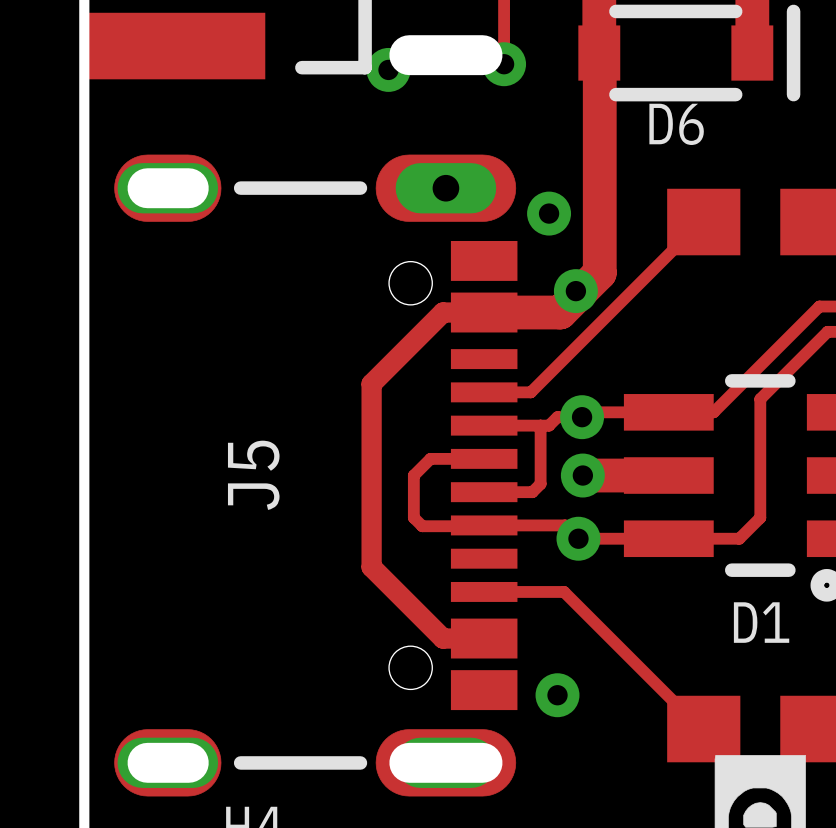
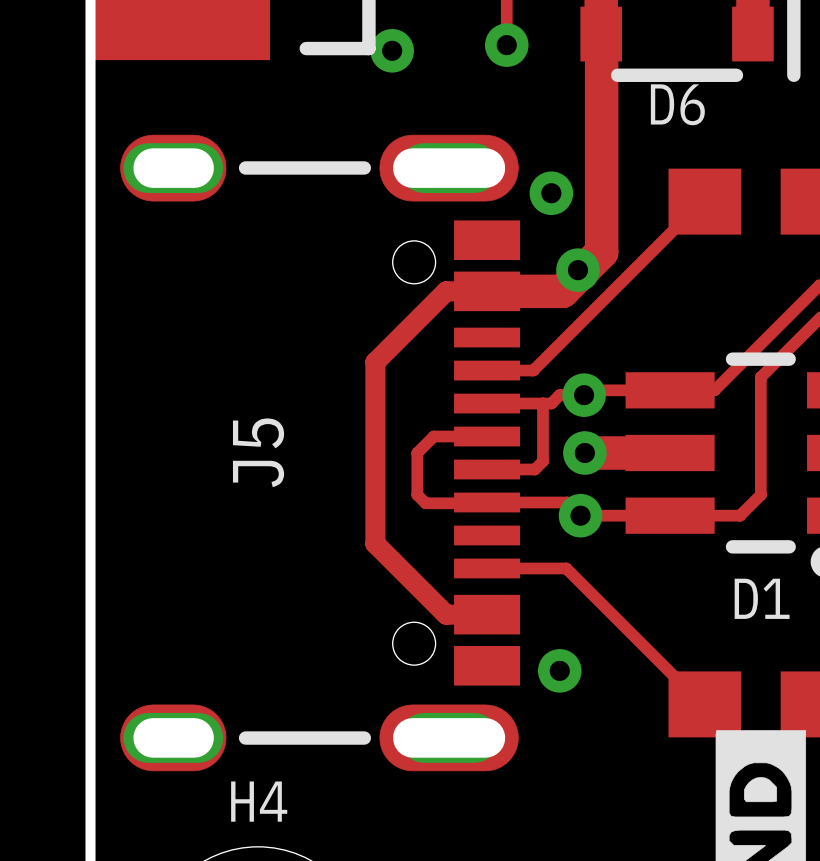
J5 footprint: [114, 35, 518, 797] -> [120, 134, 521, 772]

